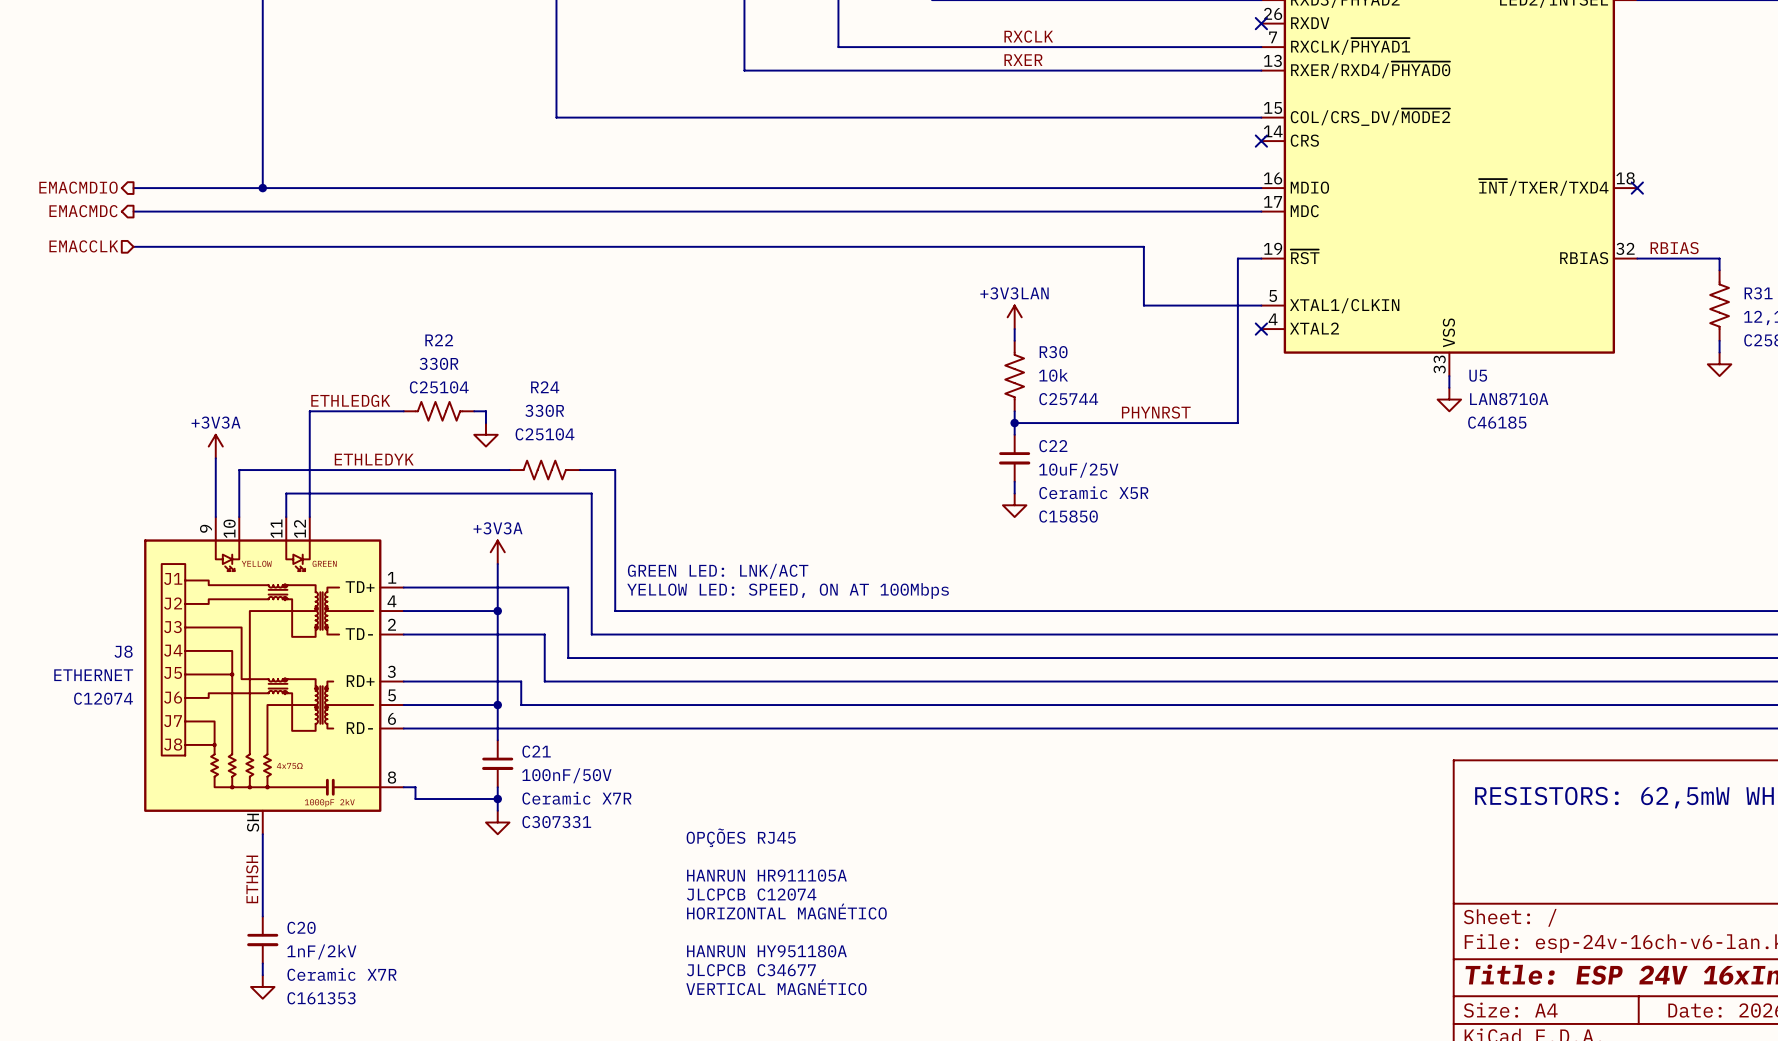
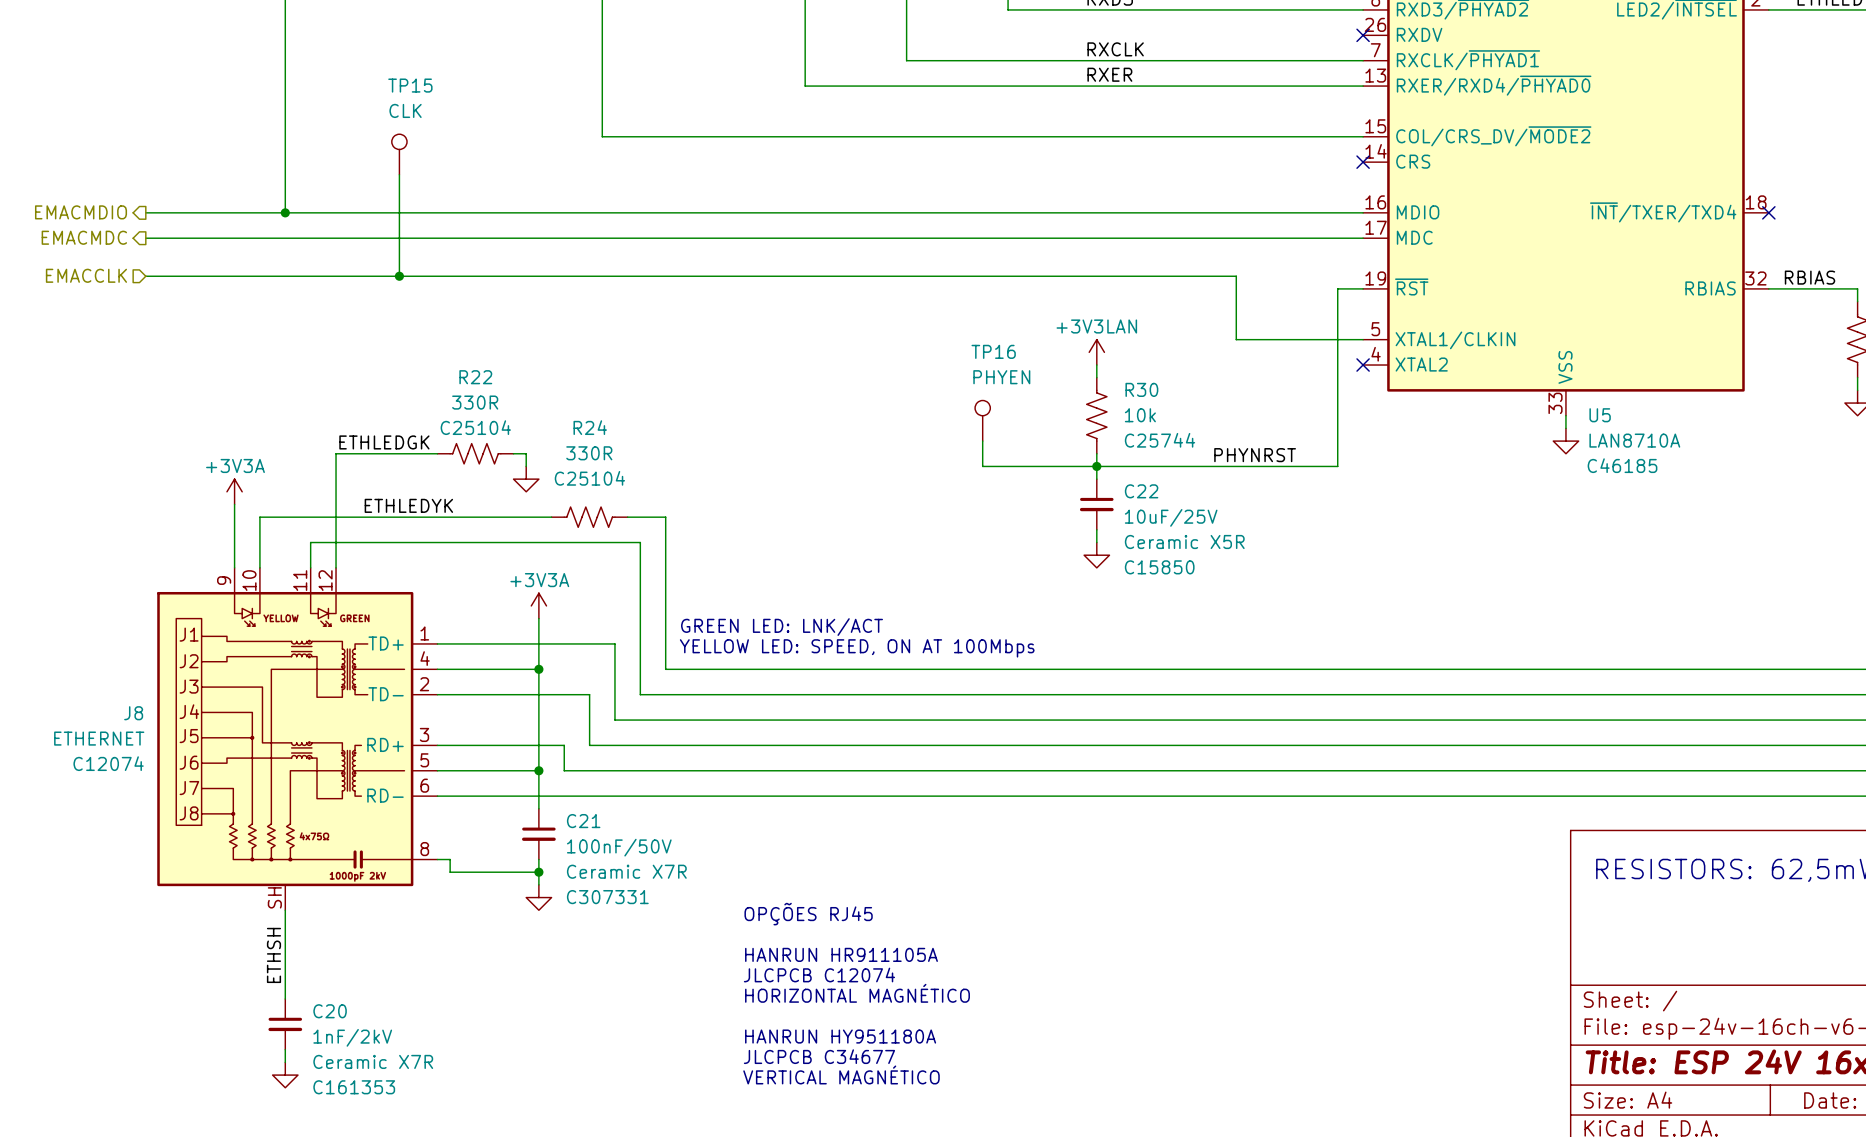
TP15: none -> CLK (399, 154)
wire: none -> (399, 174) (399, 276)
junction: none -> (399, 276)
TP16: none -> PHYEN (982, 420)
wire: none -> (982, 441) (982, 466) (1096, 466)

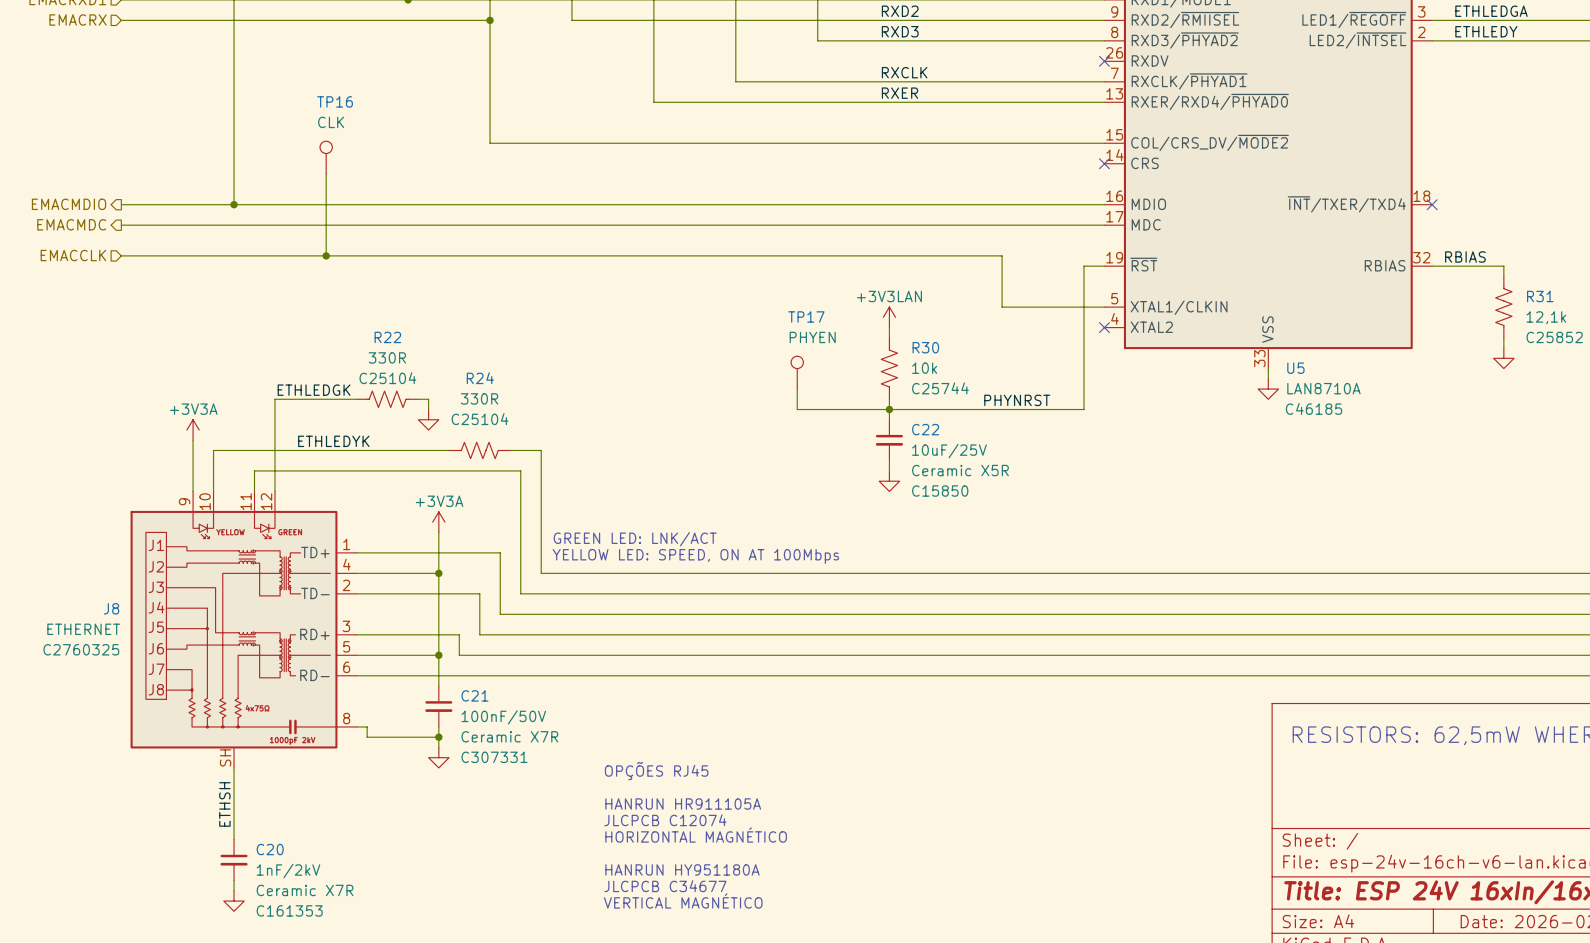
TP15 name: TP15 (410, 85) -> TP16 (335, 101)
TP16 name: TP16 (993, 351) -> TP17 (806, 316)
J8 text: C12074 (108, 763) -> C2760325 (81, 649)

